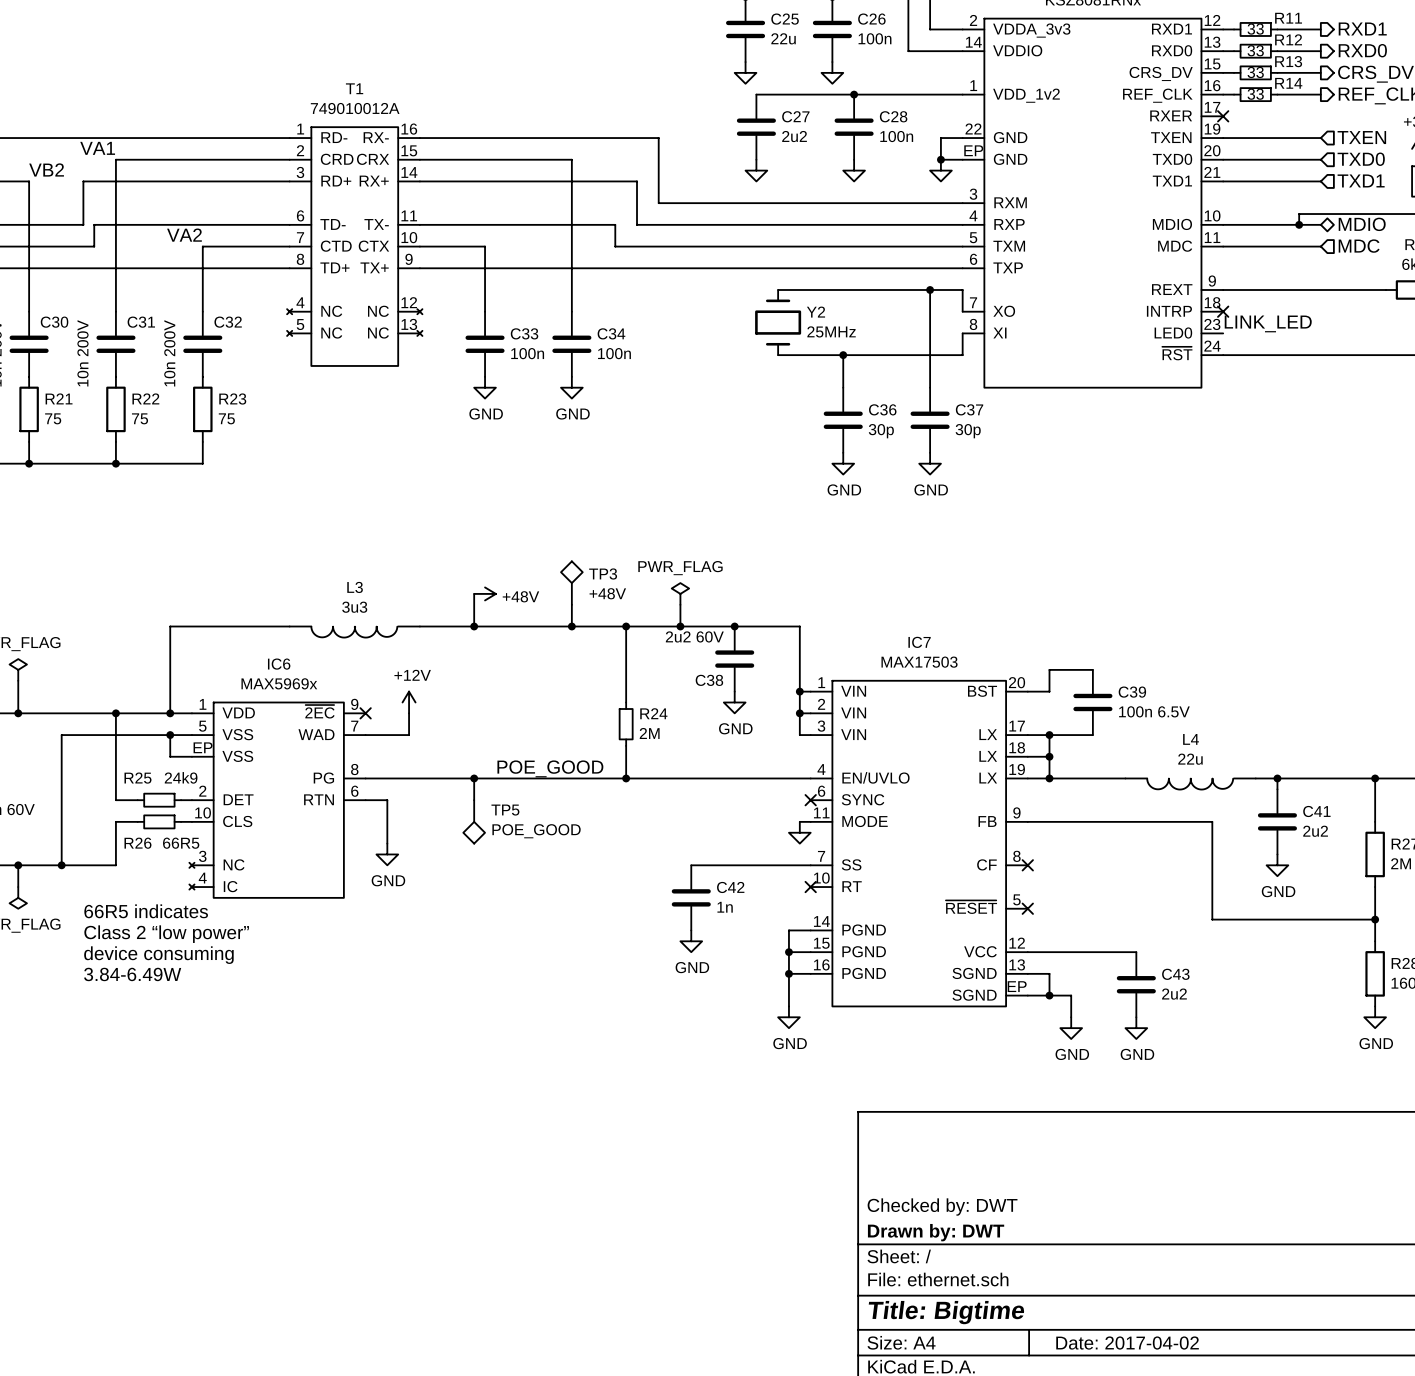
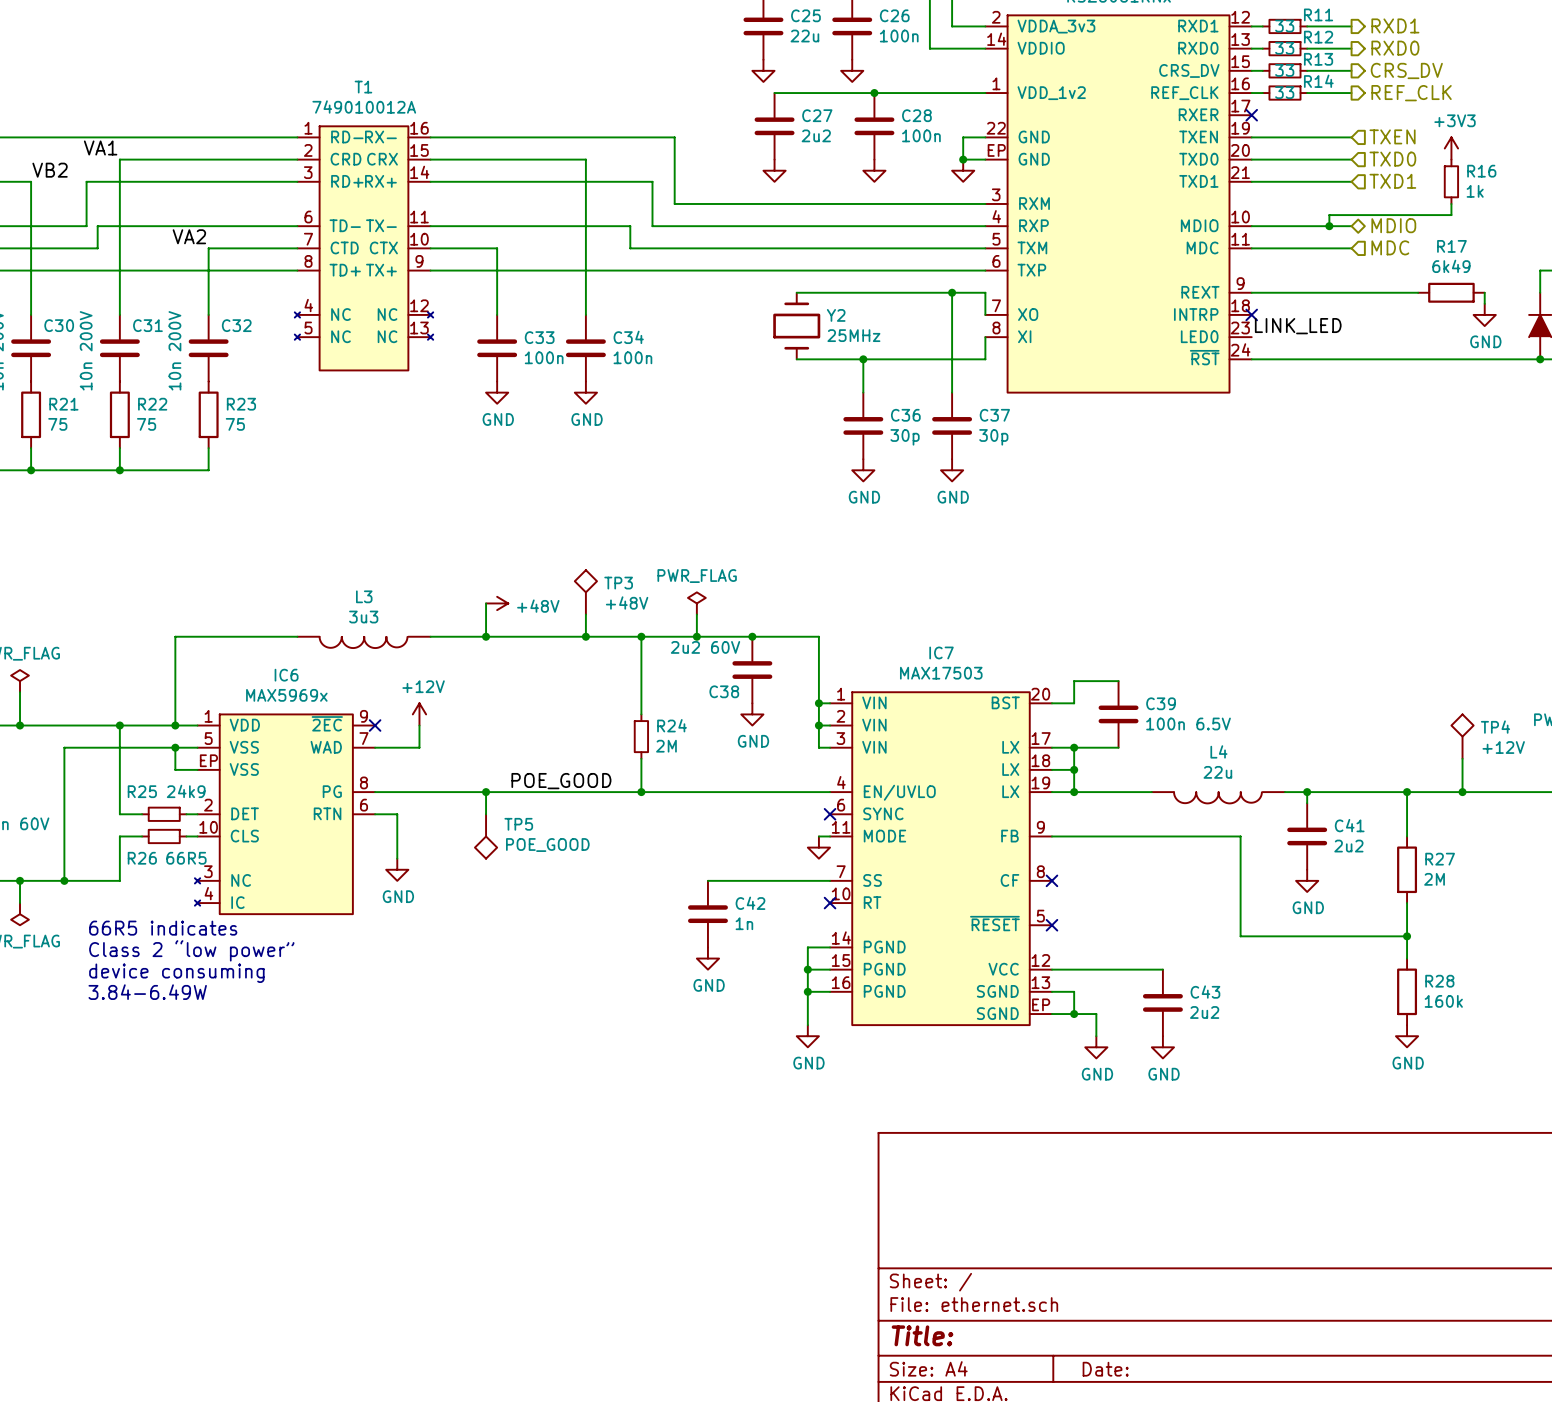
title block: Checked by: DWT (942, 1207) -> none
title block: Drawn by: DWT (936, 1232) -> none
title block: Title: Bigtime (946, 1312) -> Title: (922, 1335)
title block: Date: 2017-04-02 (1127, 1343) -> Date: (1105, 1369)

